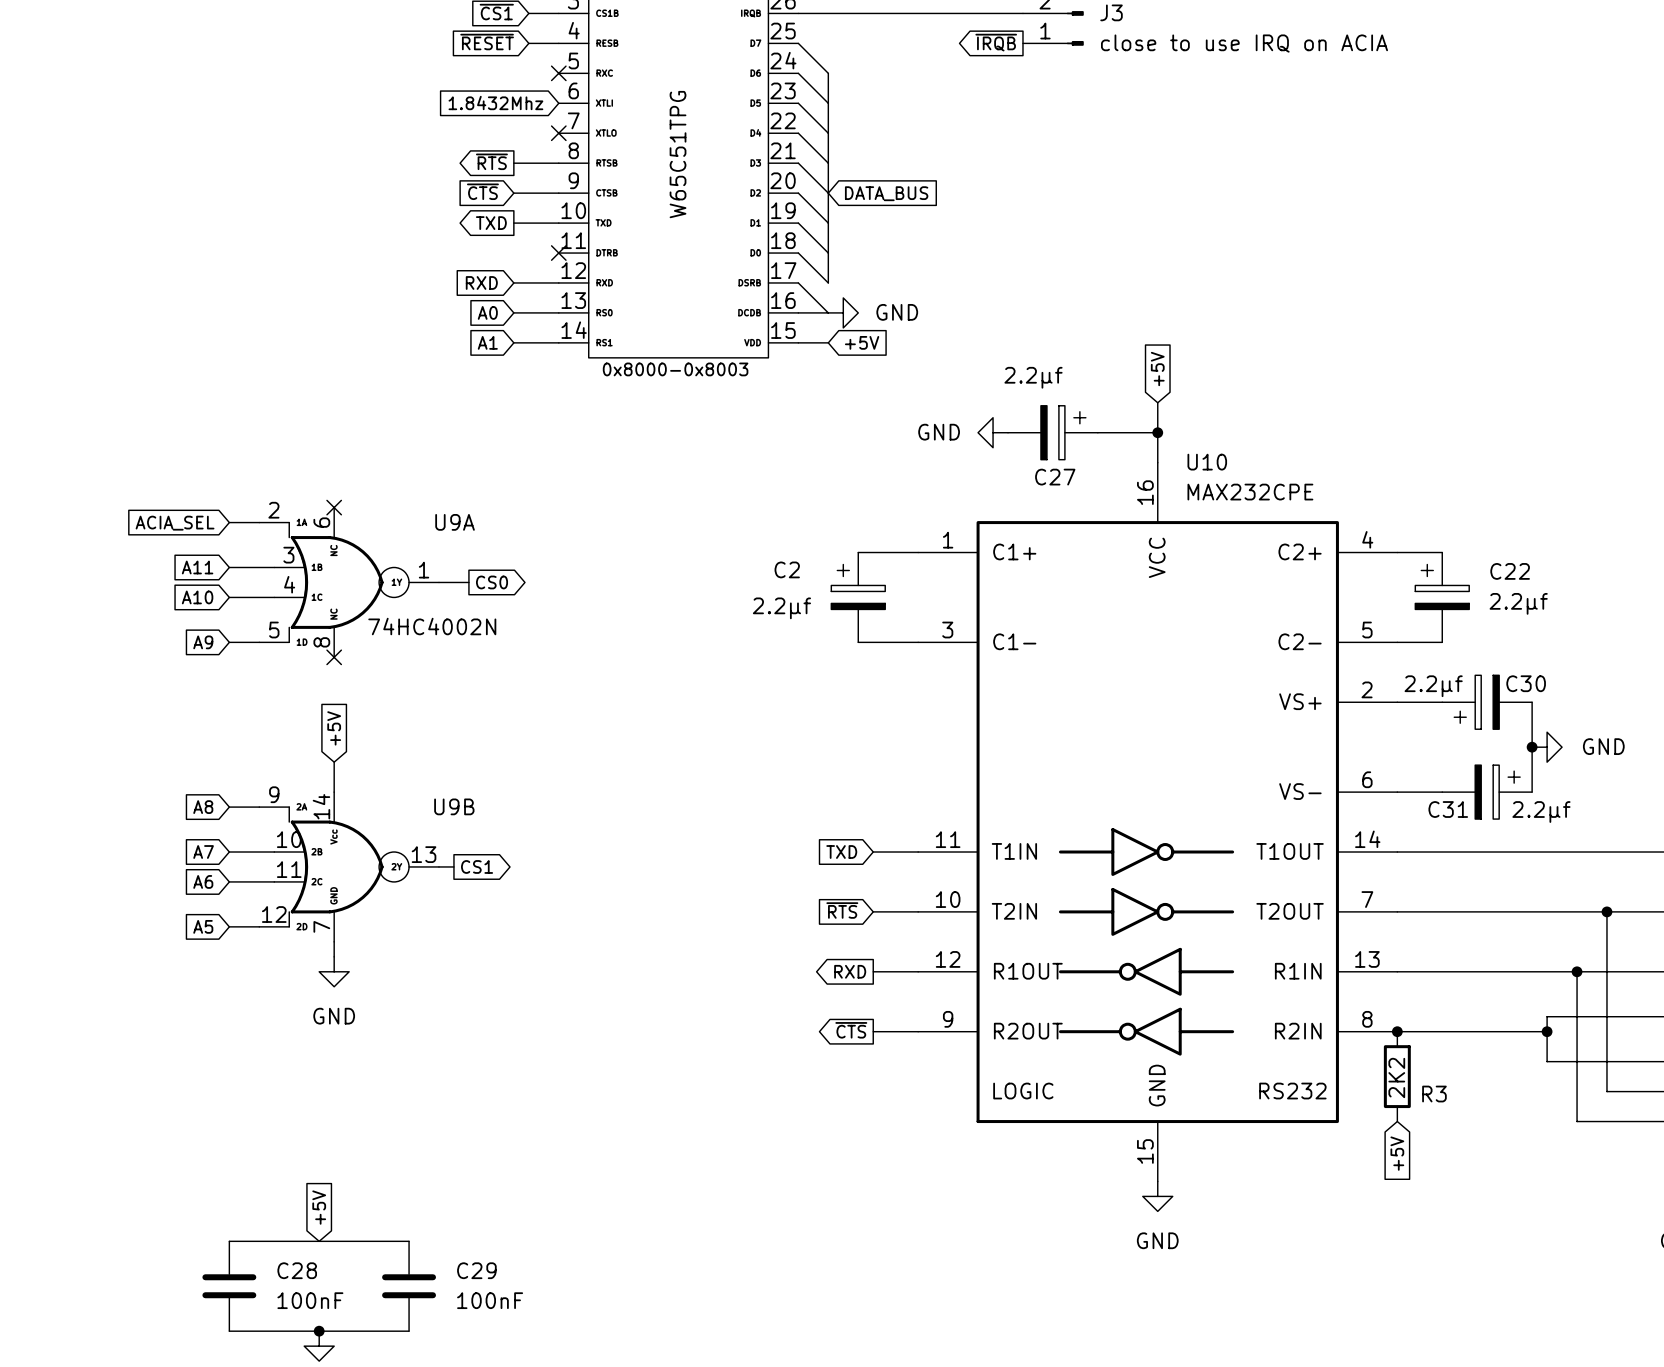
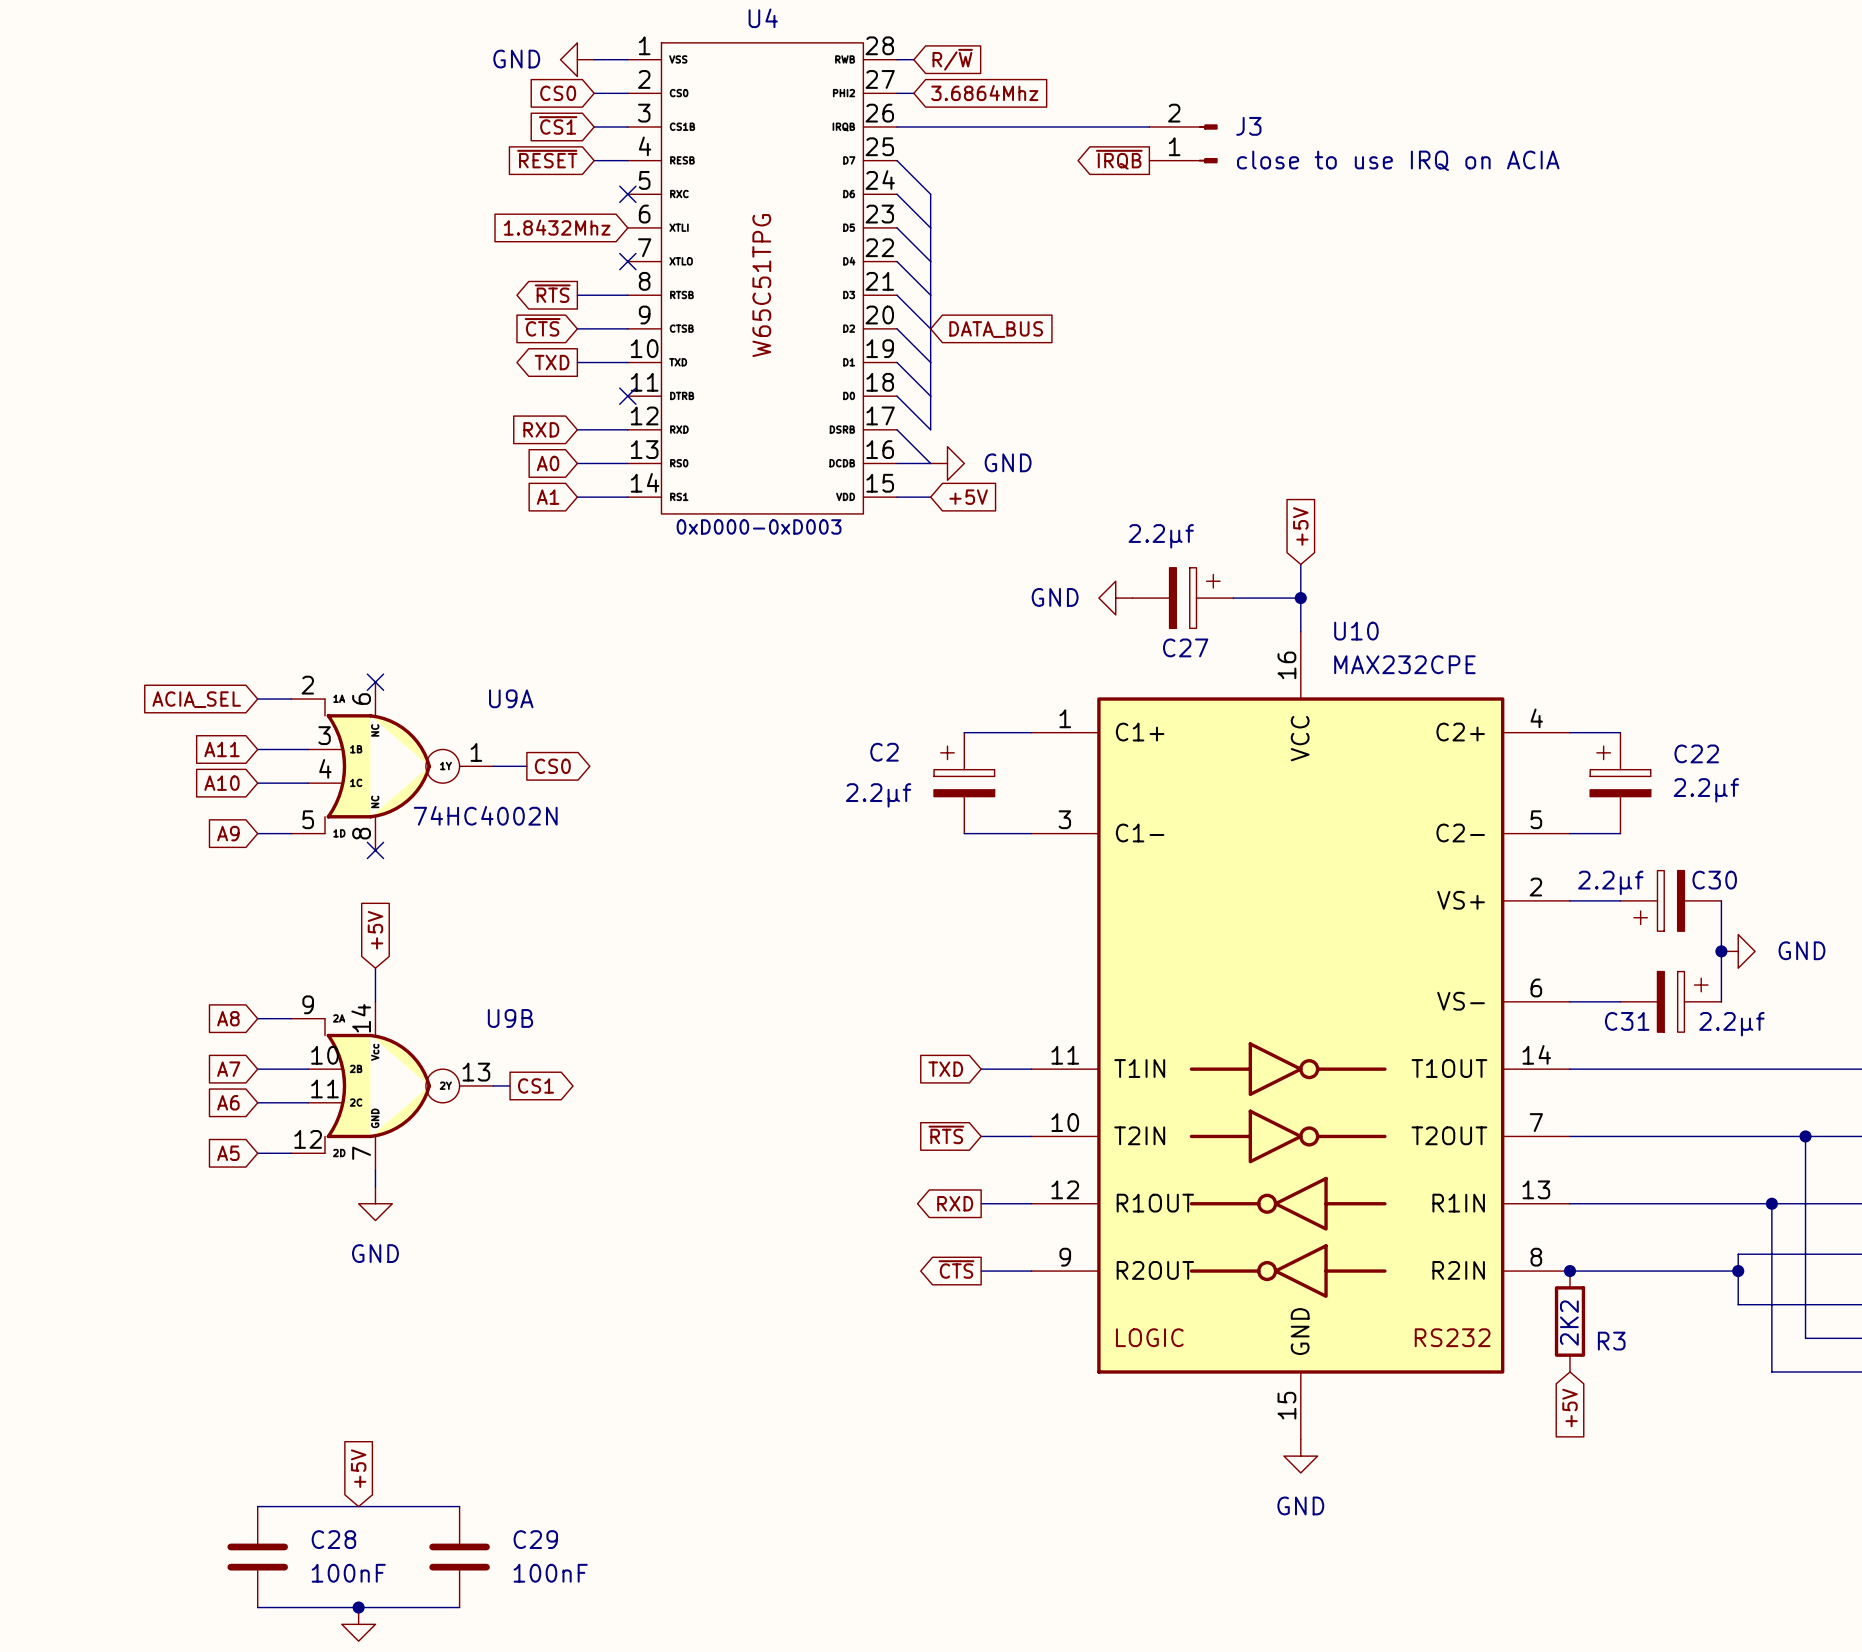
text: 0x8000-0x8003 (675, 369) -> 0xD000-0xD003 (759, 526)

